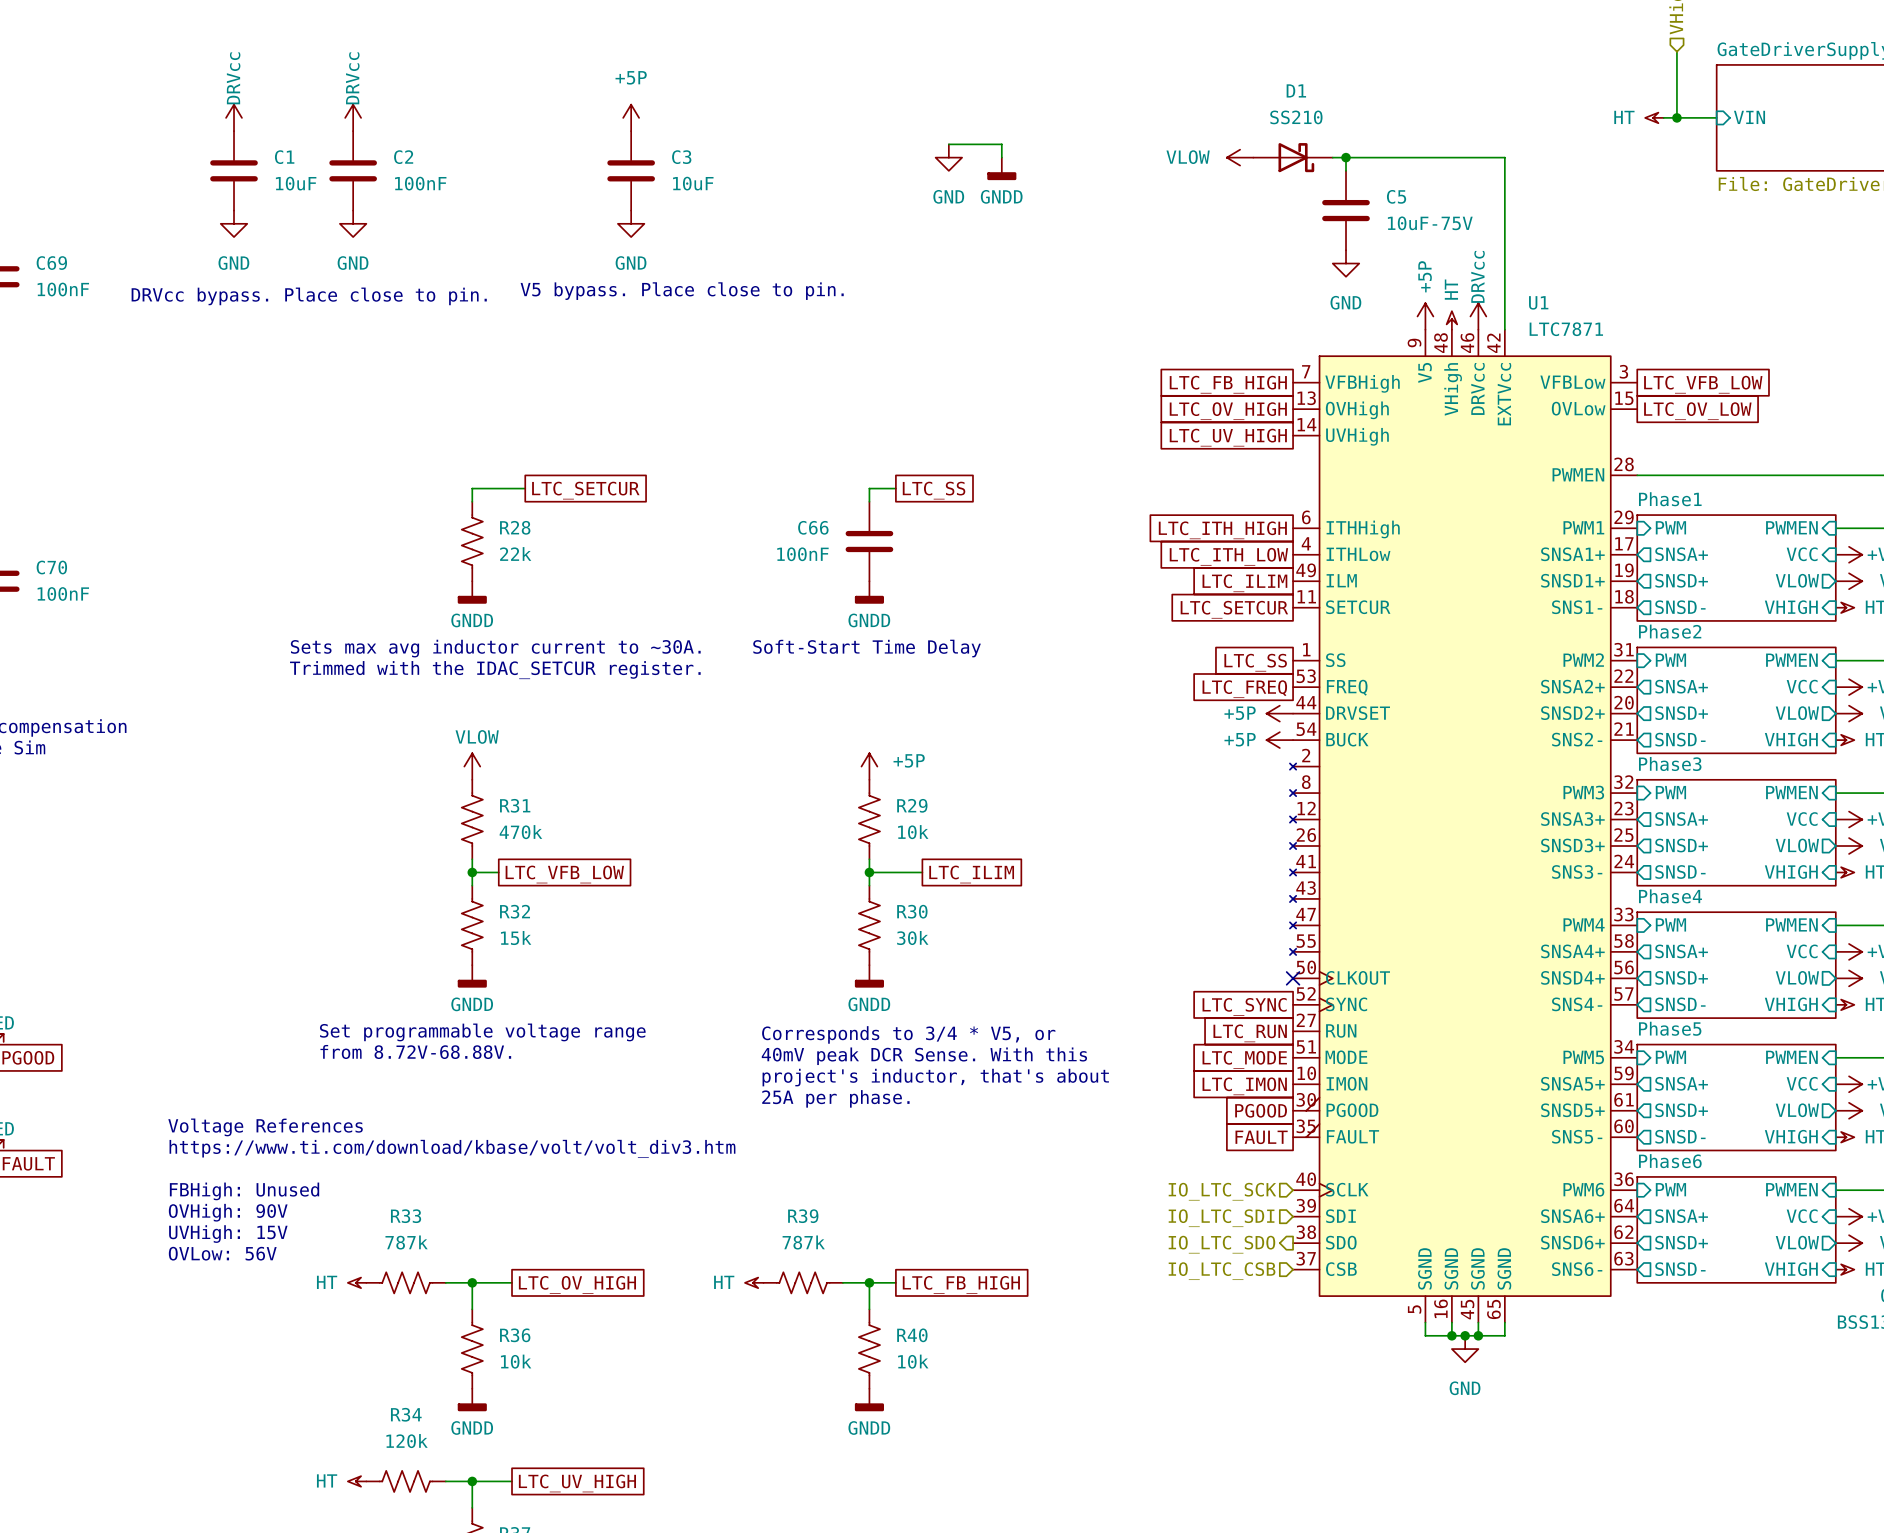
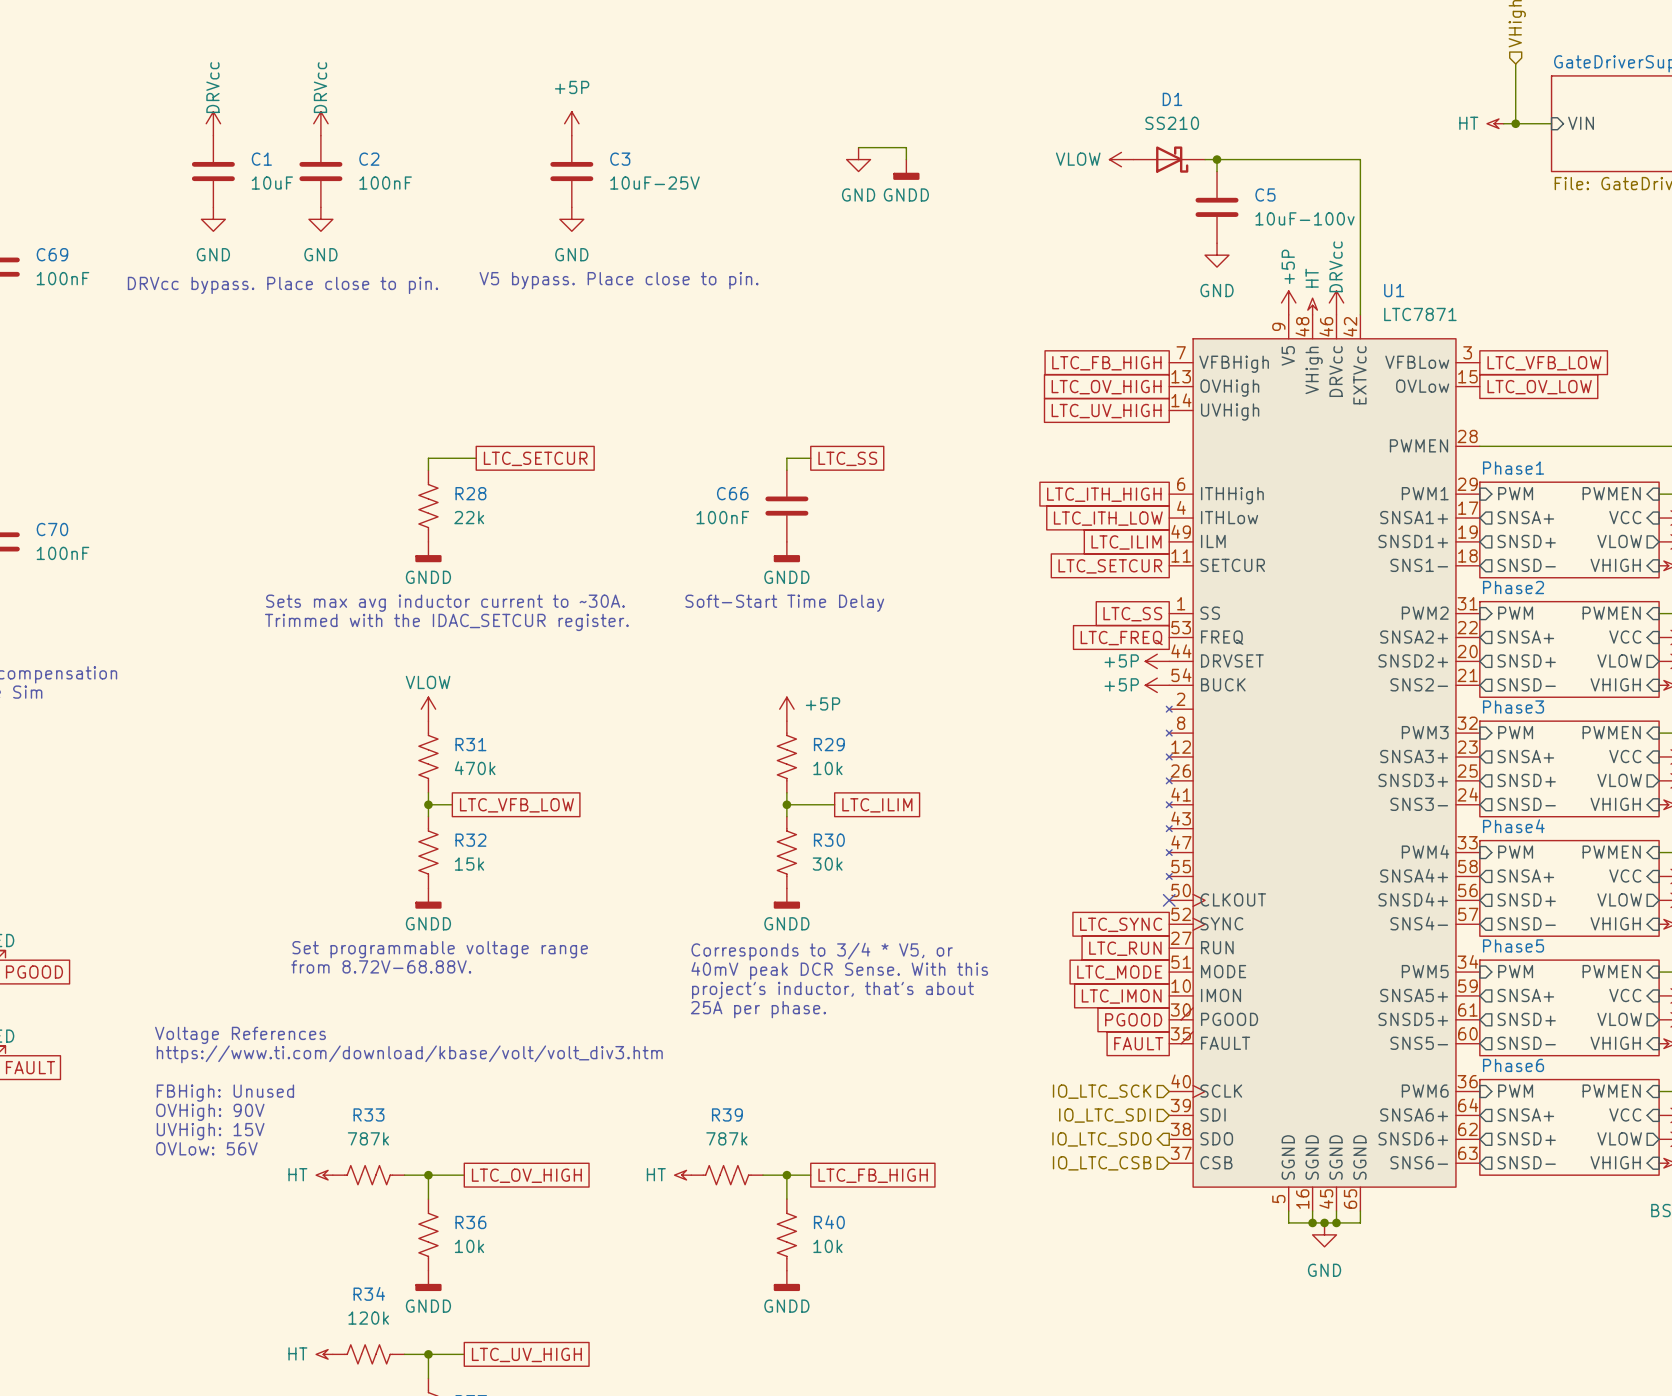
C3 value: 10uF (693, 183) -> 10uF-25V (654, 183)
C5 value: 10uF-75V (1430, 223) -> 10uF-100v (1305, 218)

